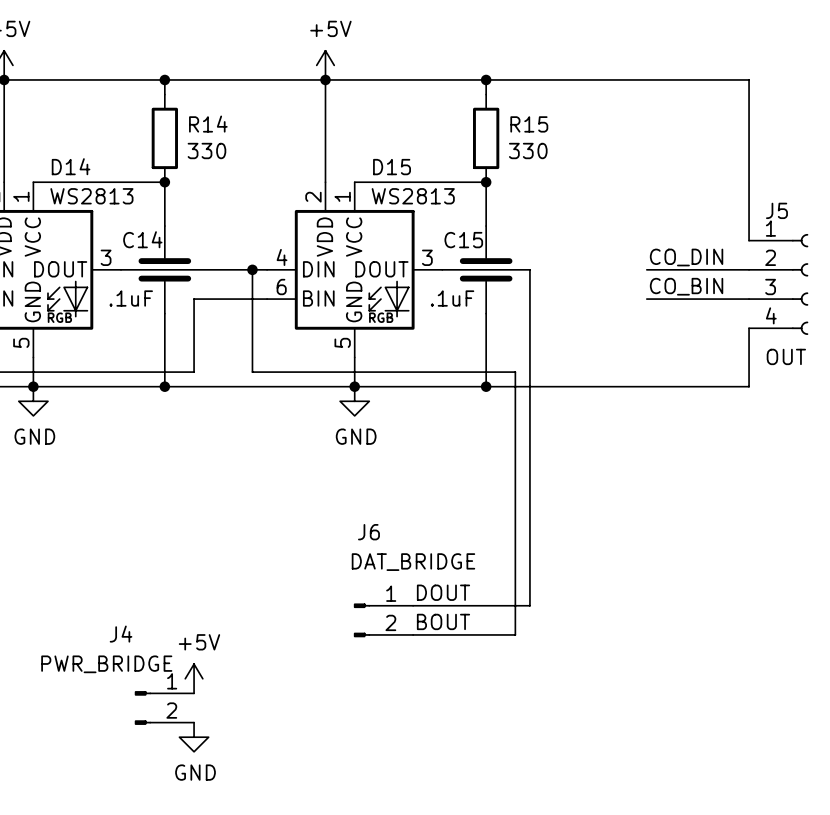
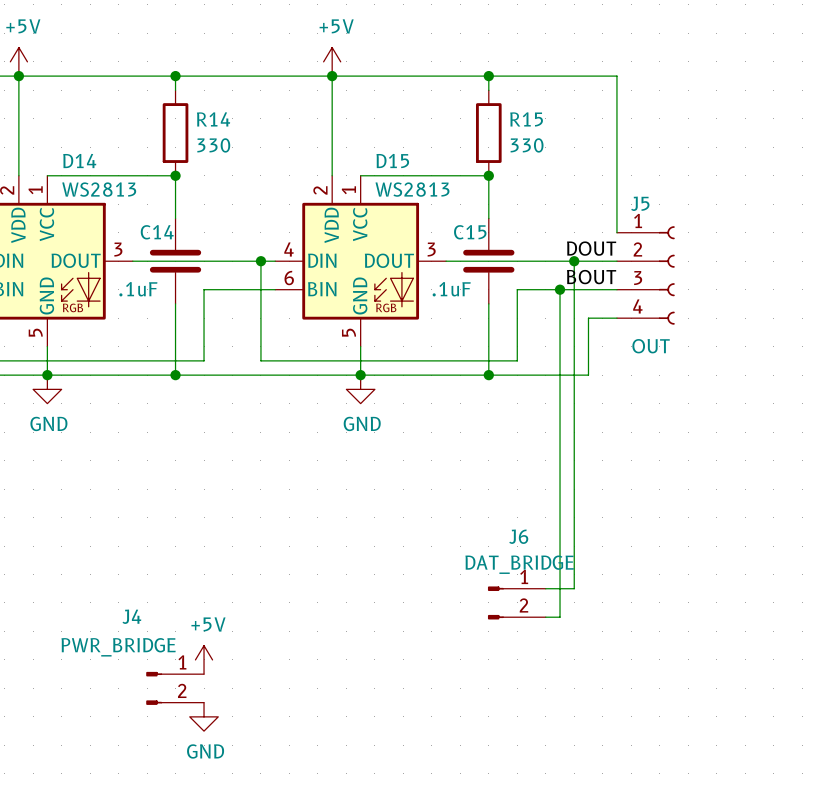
wire: (617, 79) (749, 79) (749, 240) -> (616, 76) (616, 232)
label: none -> DOUT (591, 248)
label: CO_DIN (686, 257) -> none
wire: (529, 269) (529, 605) (413, 605) -> (531, 261) (616, 261)
wire: none -> (574, 261) (574, 588) (545, 588)
junction: none -> (574, 261)
wire: (646, 269) (749, 269) -> none
J5 position: (778, 284) -> (645, 275)
label: none -> BOUT (591, 277)
label: CO_BIN (686, 286) -> none
wire: none -> (560, 289) (560, 617) (545, 617)
junction: none -> (560, 289)
wire: (646, 299) (749, 299) -> none
wire: (749, 328) (749, 386) (588, 386) -> (616, 318) (588, 318) (588, 375)
wire: (515, 372) (515, 634) (413, 634) -> (517, 360) (517, 289) (616, 289)
J6 name position: J6 (368, 532) -> J6 (518, 536)
J6 value position: DAT_BRIDGE (413, 562) -> DAT_BRIDGE (519, 564)
label: DOUT (443, 592) -> none
J6 position: (383, 620) -> (516, 602)
label: BOUT (443, 621) -> none

